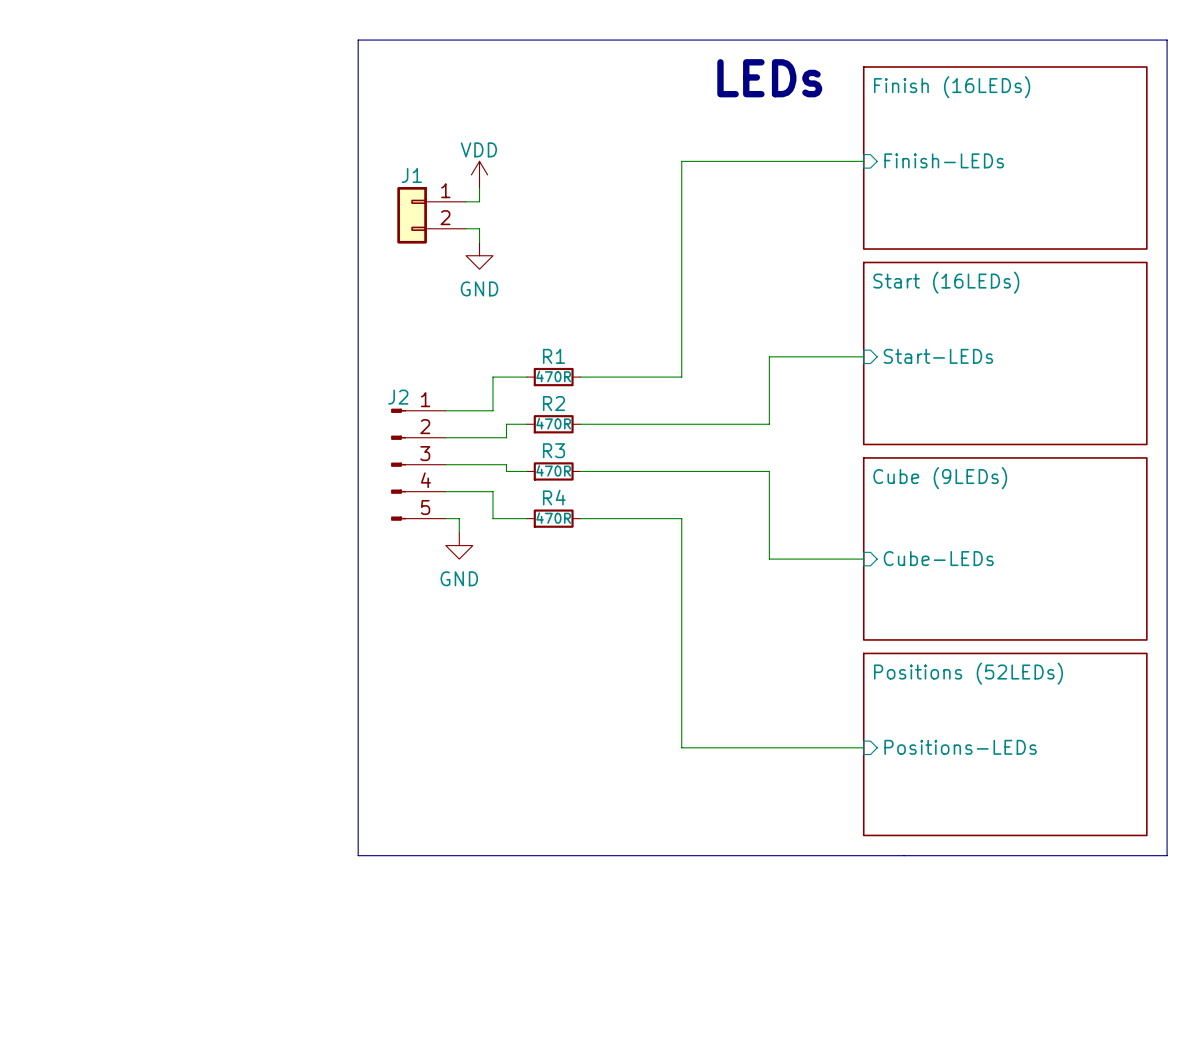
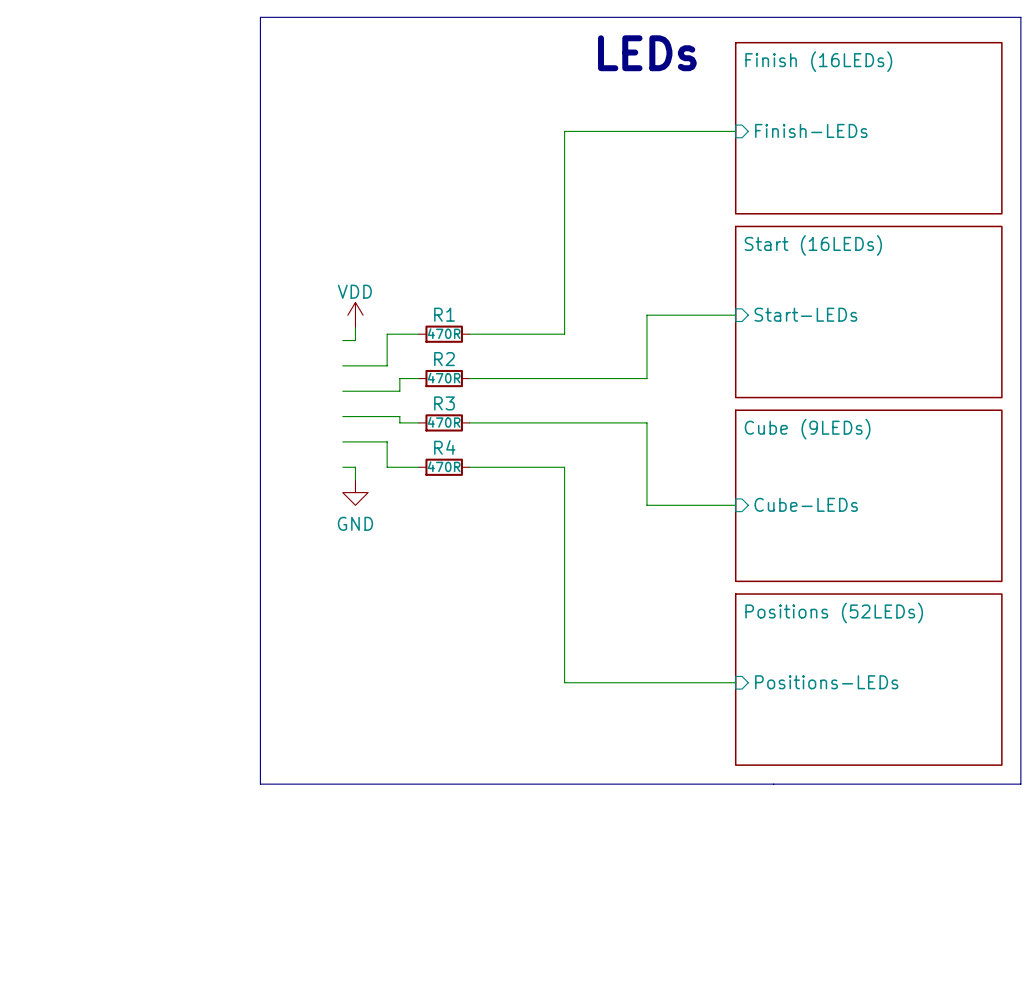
power symbol position: VDD (479, 174) -> VDD (355, 315)
wire: (479, 188) (479, 201) (466, 201) -> (355, 327) (355, 340) (342, 340)
J1: (431, 215) -> none
wire: (466, 228) (479, 228) (479, 242) -> none
power symbol: GND (479, 255) -> none
J2: (418, 464) -> none

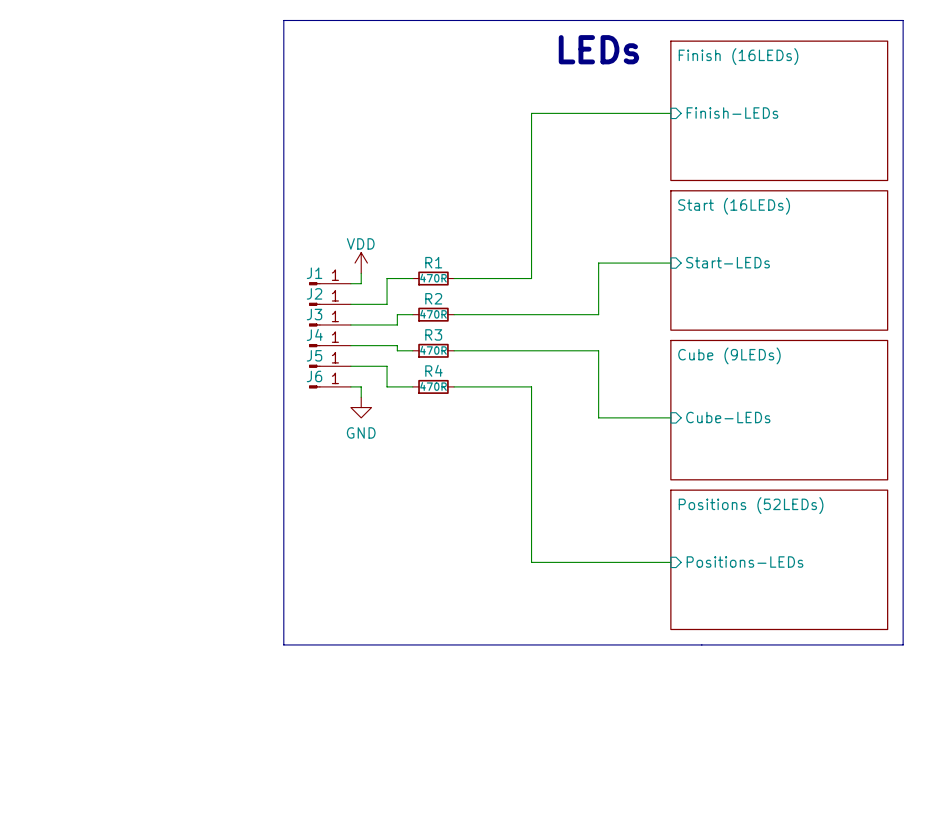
J1: none -> (329, 283)
J2: none -> (329, 304)
J3: none -> (329, 324)
J4: none -> (329, 345)
J5: none -> (329, 366)
J6: none -> (329, 386)

